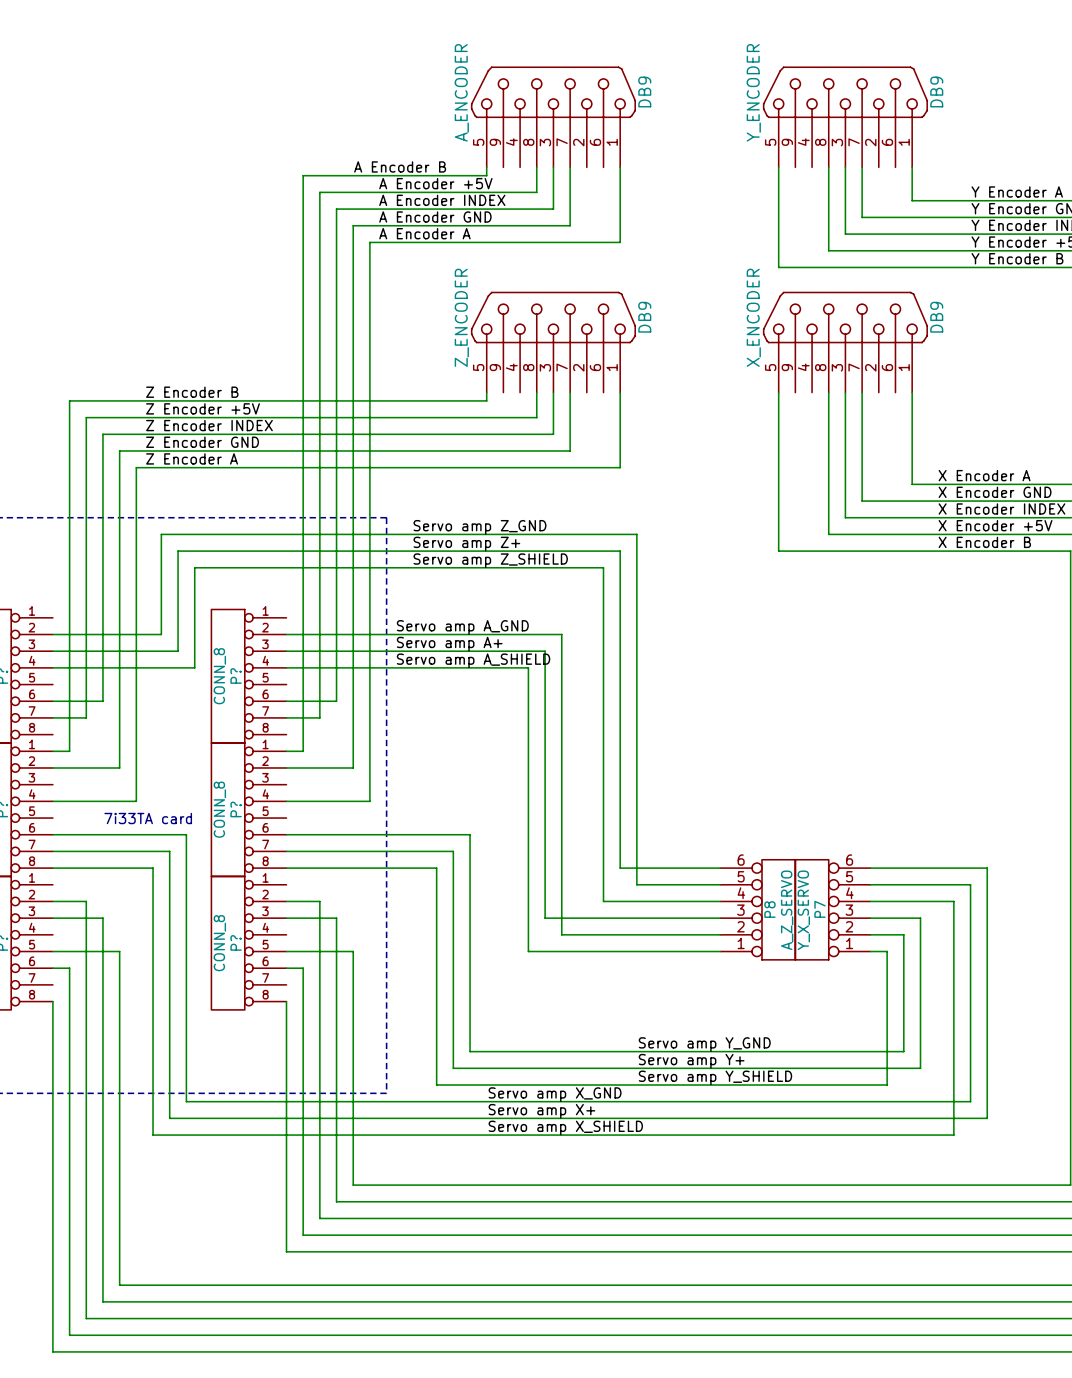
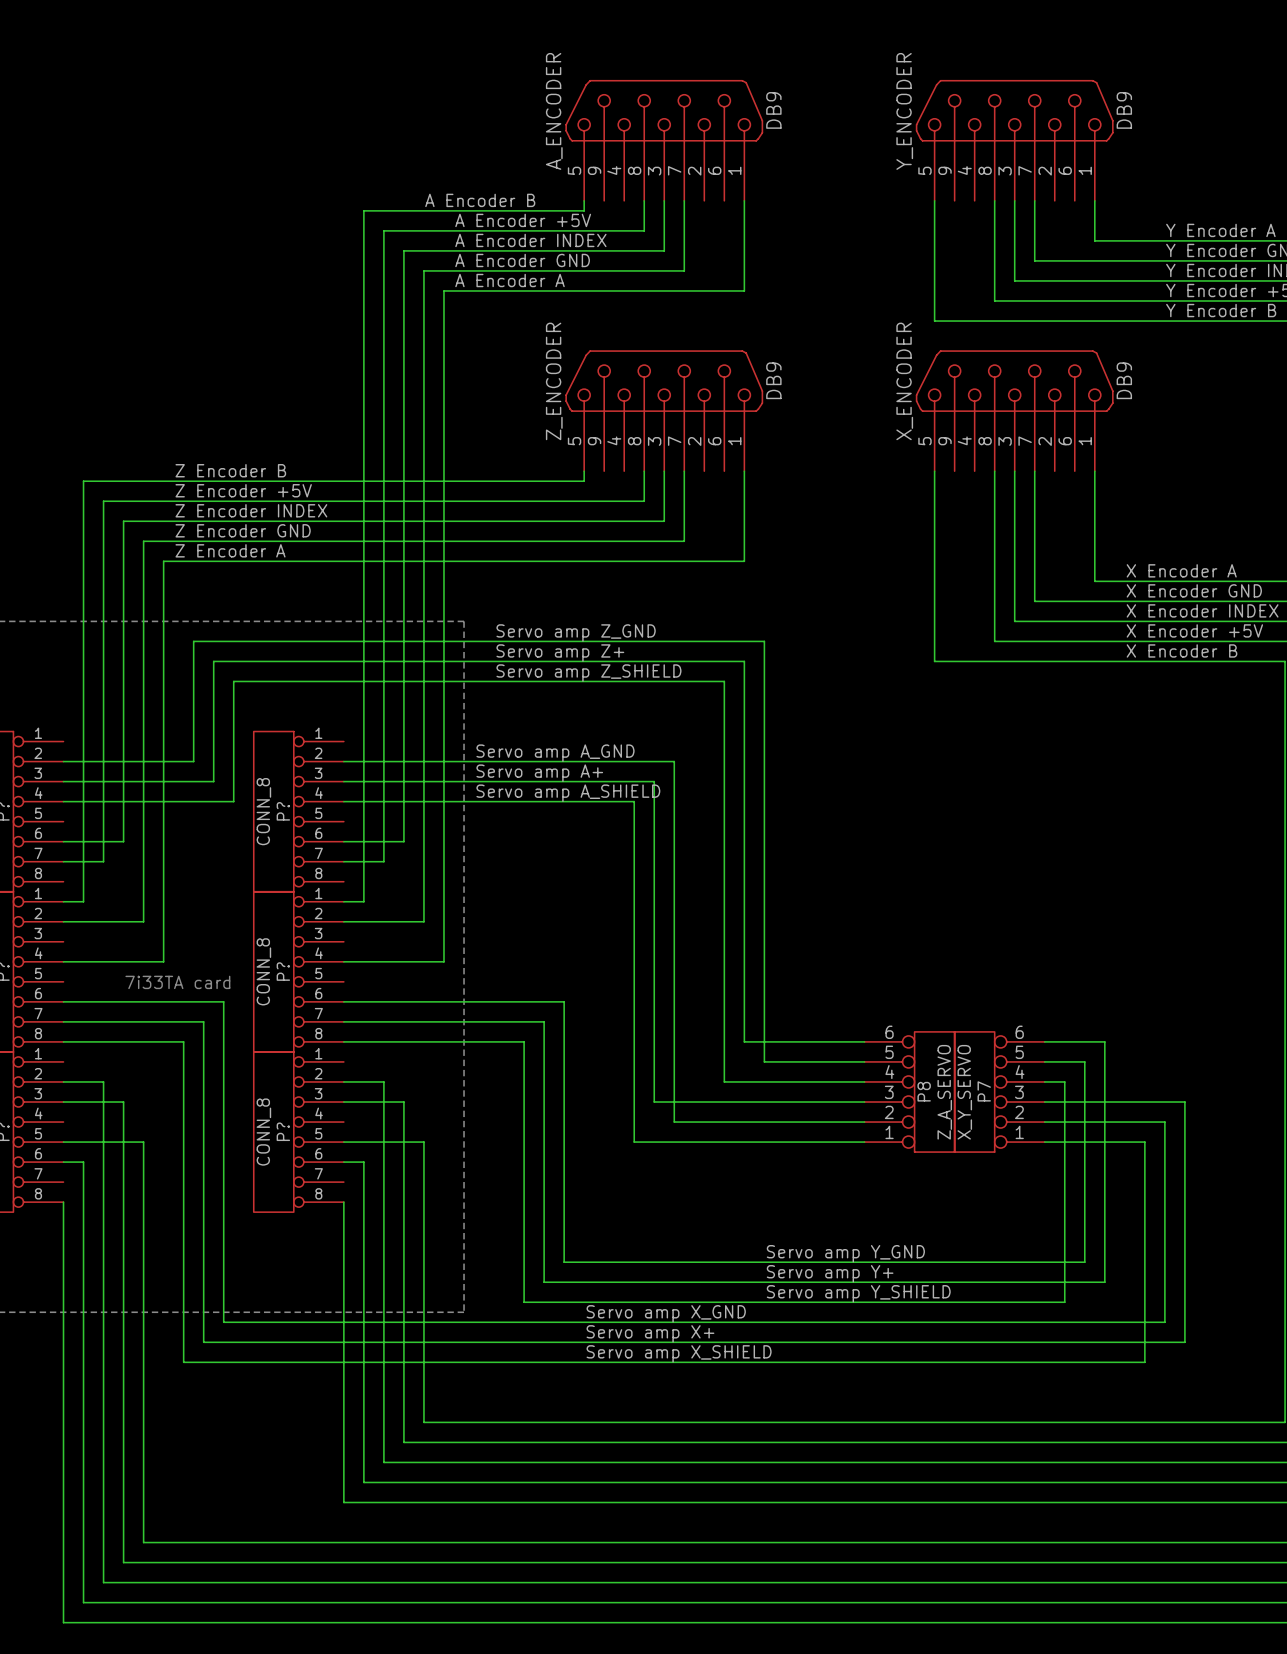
wire: (920, 868) (987, 868) (987, 918) -> (1104, 1041) (1104, 1102) (1184, 1102)
wire: (903, 884) (970, 884) (970, 934) -> (1084, 1061) (1084, 1122) (1164, 1122)
wire: (887, 901) (953, 901) (953, 951) -> (1064, 1081) (1064, 1142) (1144, 1142)
P8 value: A_Z_SERVO (787, 910) -> Z_A_SERVO (944, 1092)
P7 value: Y_X_SERVO (803, 910) -> X_Y_SERVO (964, 1092)

